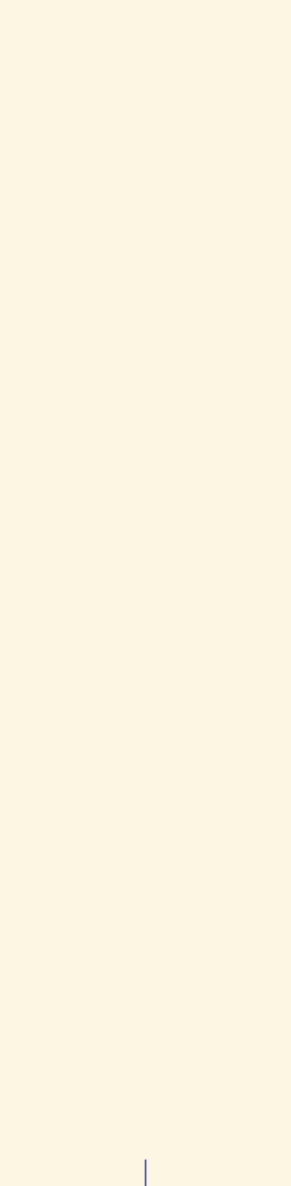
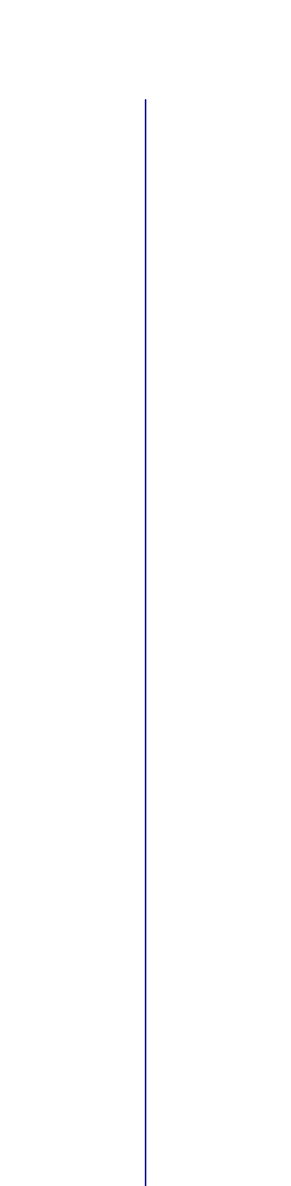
line: none -> (145, 99) (145, 1160)

